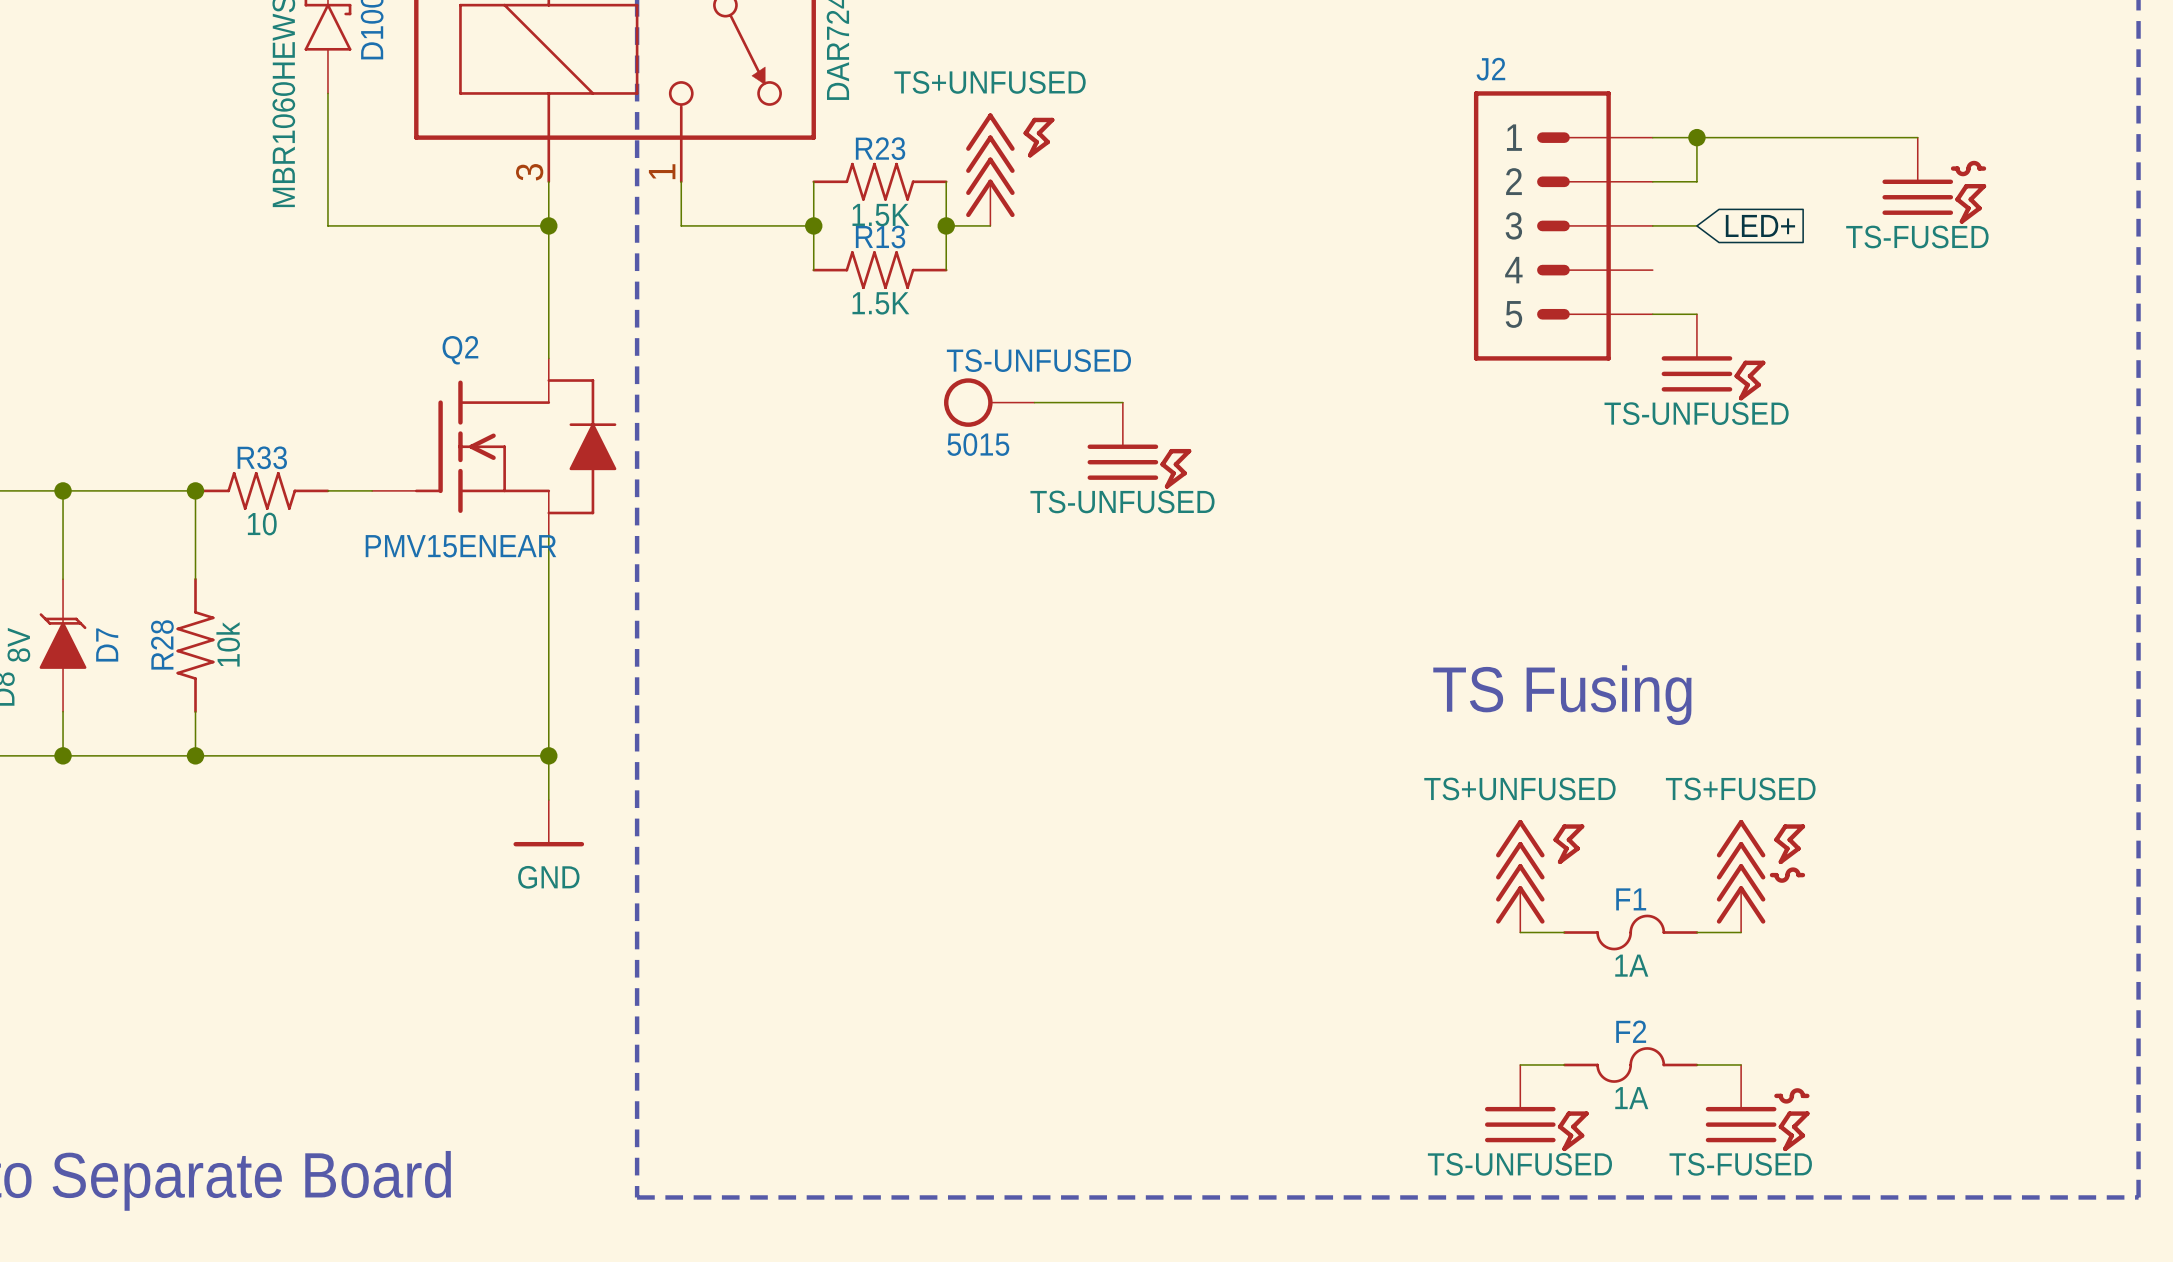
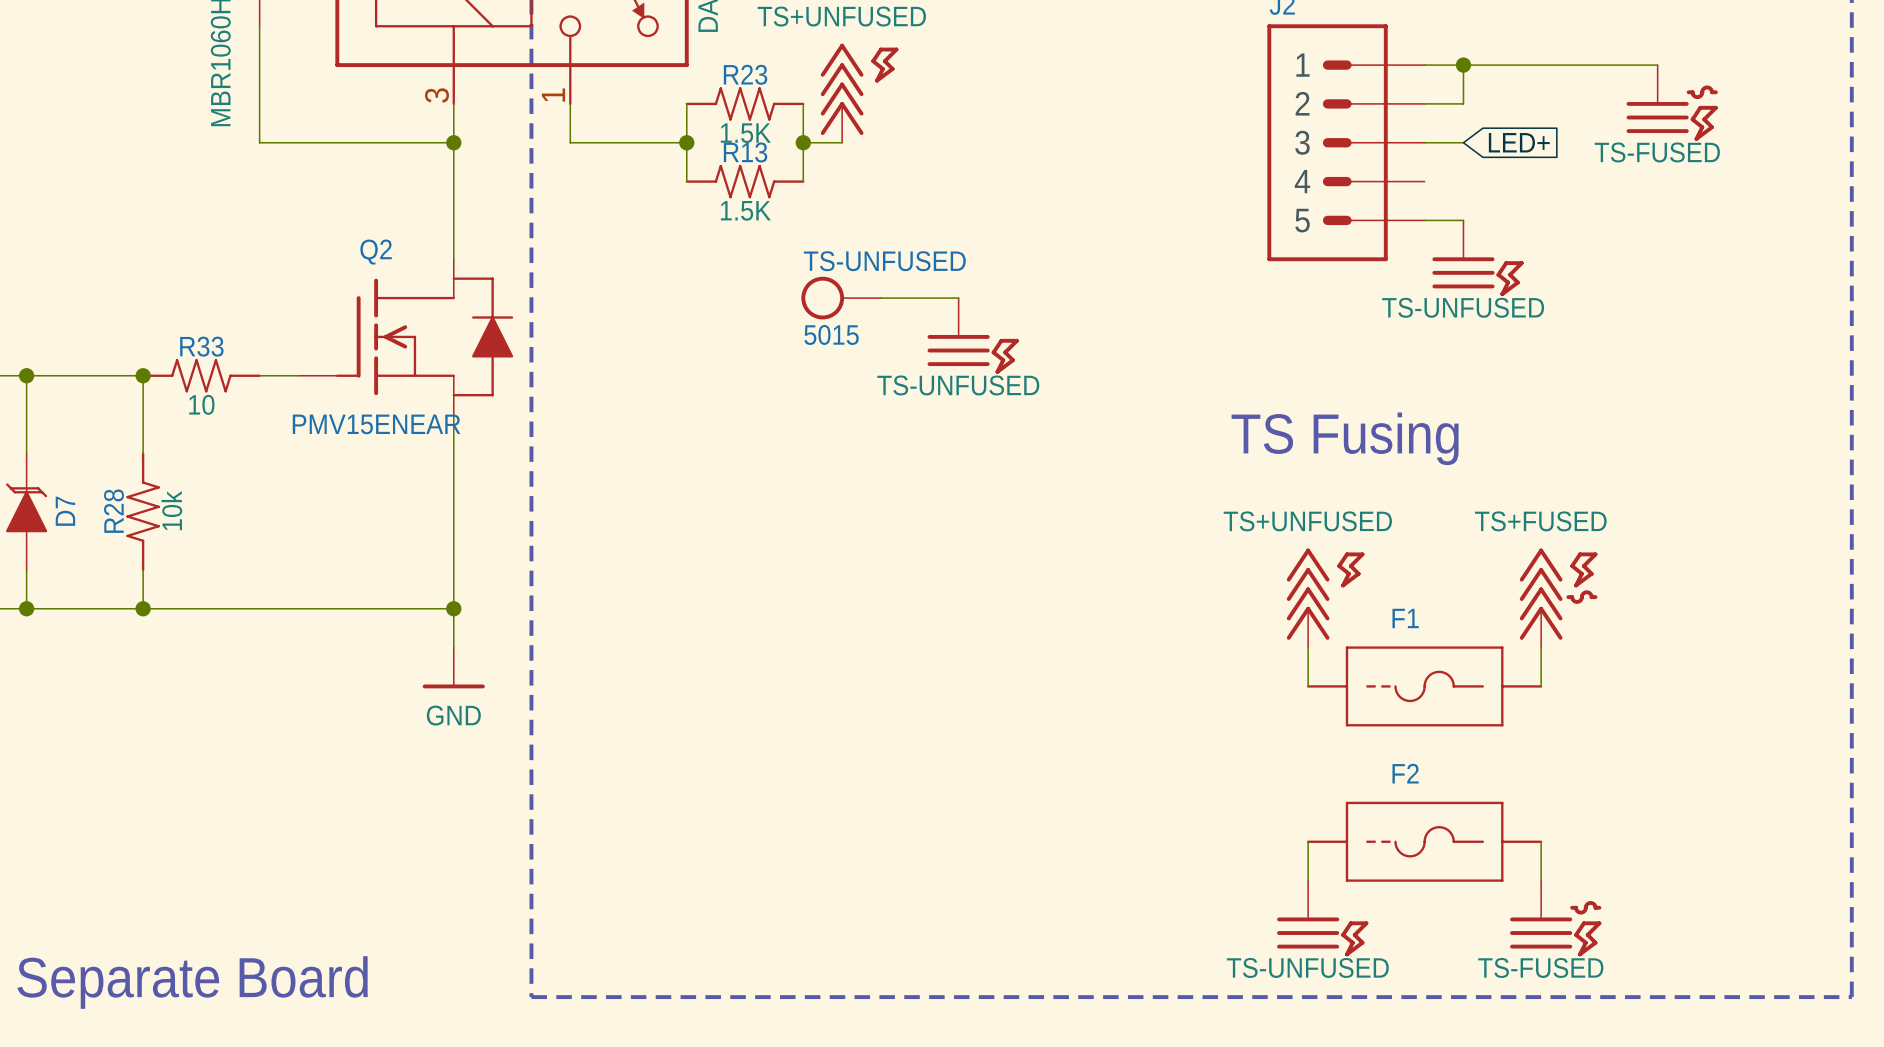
text position: TS Fusing (1562, 695) -> TS Fusing (1345, 438)
wire: none -> (1308, 647) (1308, 686)
wire: none -> (1541, 647) (1541, 686)
power symbol position: TS+UNFUSED (1540, 876) -> TS+UNFUSED (1325, 598)
power symbol position: TS+FUSED (1760, 876) -> TS+FUSED (1558, 598)
F1 name position: F1 (1631, 899) -> F1 (1405, 618)
F1 symbol: [1563, 914, 1699, 951] -> [1306, 646, 1543, 727]
wire: (1520, 932) (1564, 932) -> none
wire: (1696, 932) (1741, 932) -> none
F1 text: 1A (1631, 965) -> none
wire: none -> (1541, 841) (1541, 880)
F2 name position: F2 (1631, 1031) -> F2 (1405, 773)
F2 symbol: [1563, 1047, 1699, 1083] -> [1306, 801, 1543, 882]
wire: (1520, 1064) (1564, 1064) -> (1308, 880) (1308, 841)
F2 text: 1A (1631, 1098) -> none
power symbol position: TS-FUSED (1757, 1108) -> TS-FUSED (1555, 918)

